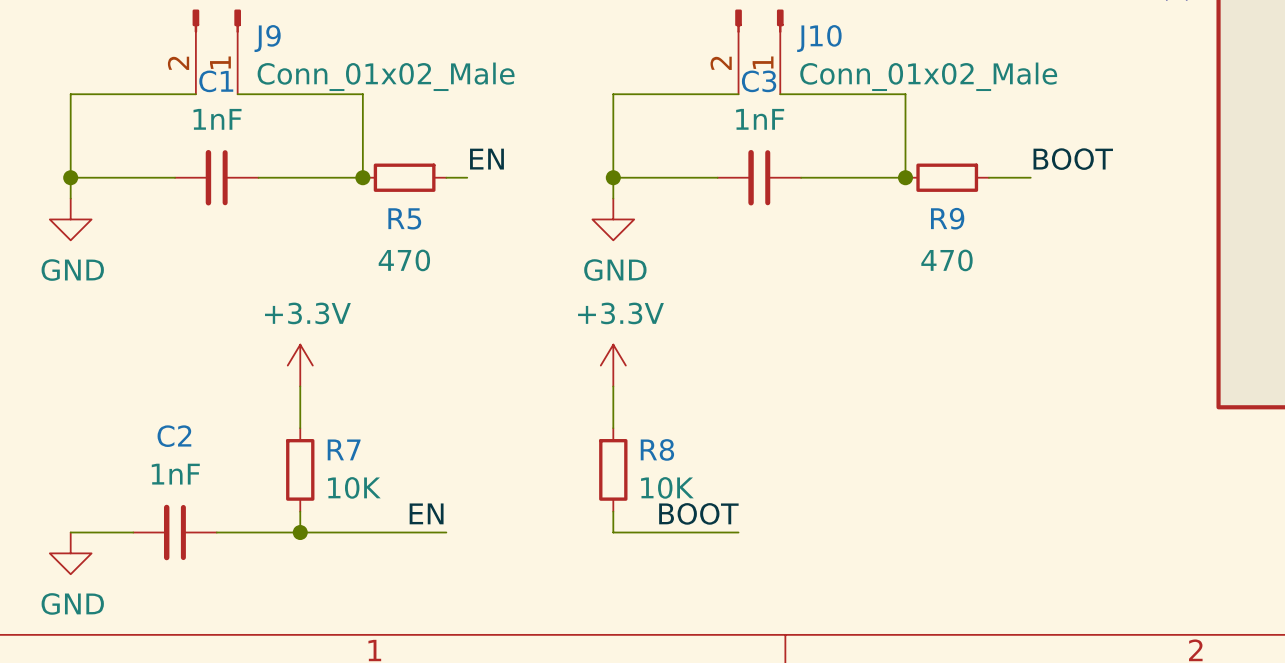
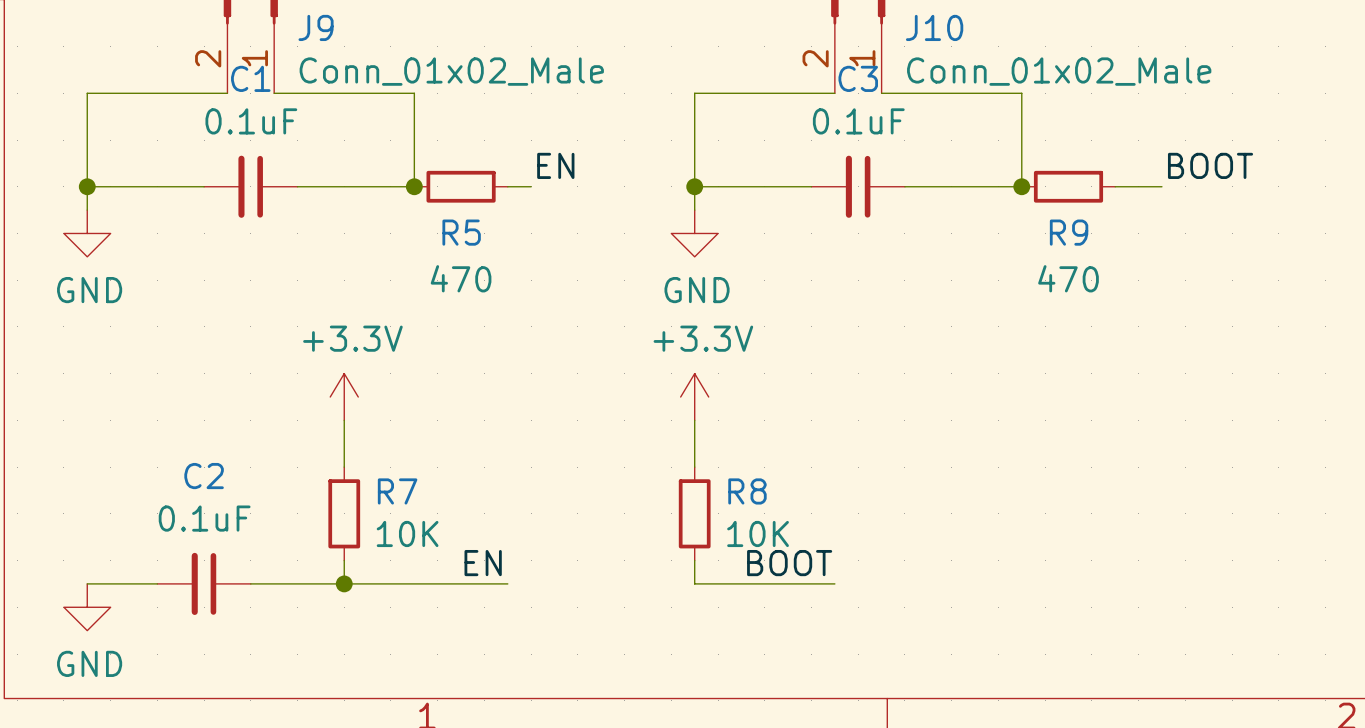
C1 value: 1nF (217, 119) -> 0.1uF (251, 121)
C3 value: 1nF (760, 119) -> 0.1uF (858, 121)
C2 value: 1nF (175, 474) -> 0.1uF (204, 518)

